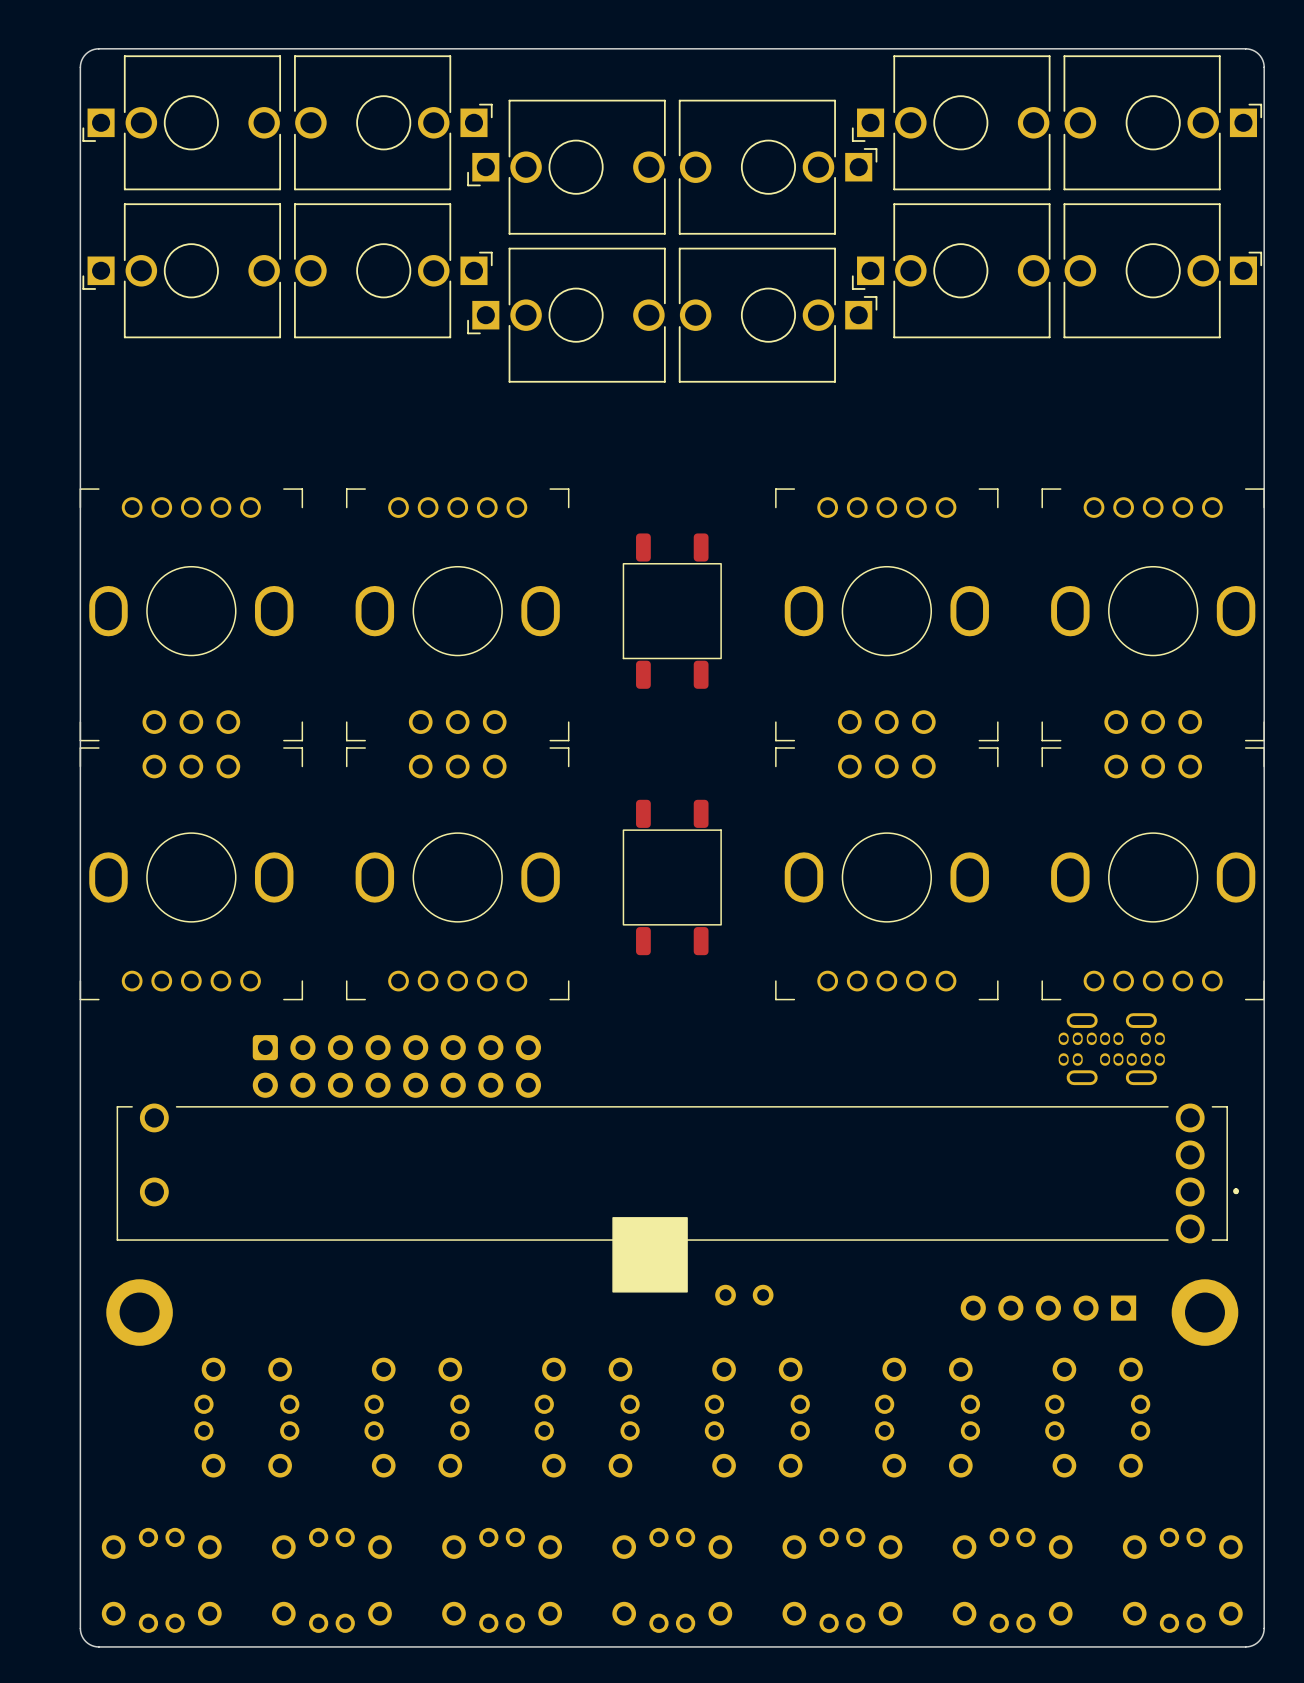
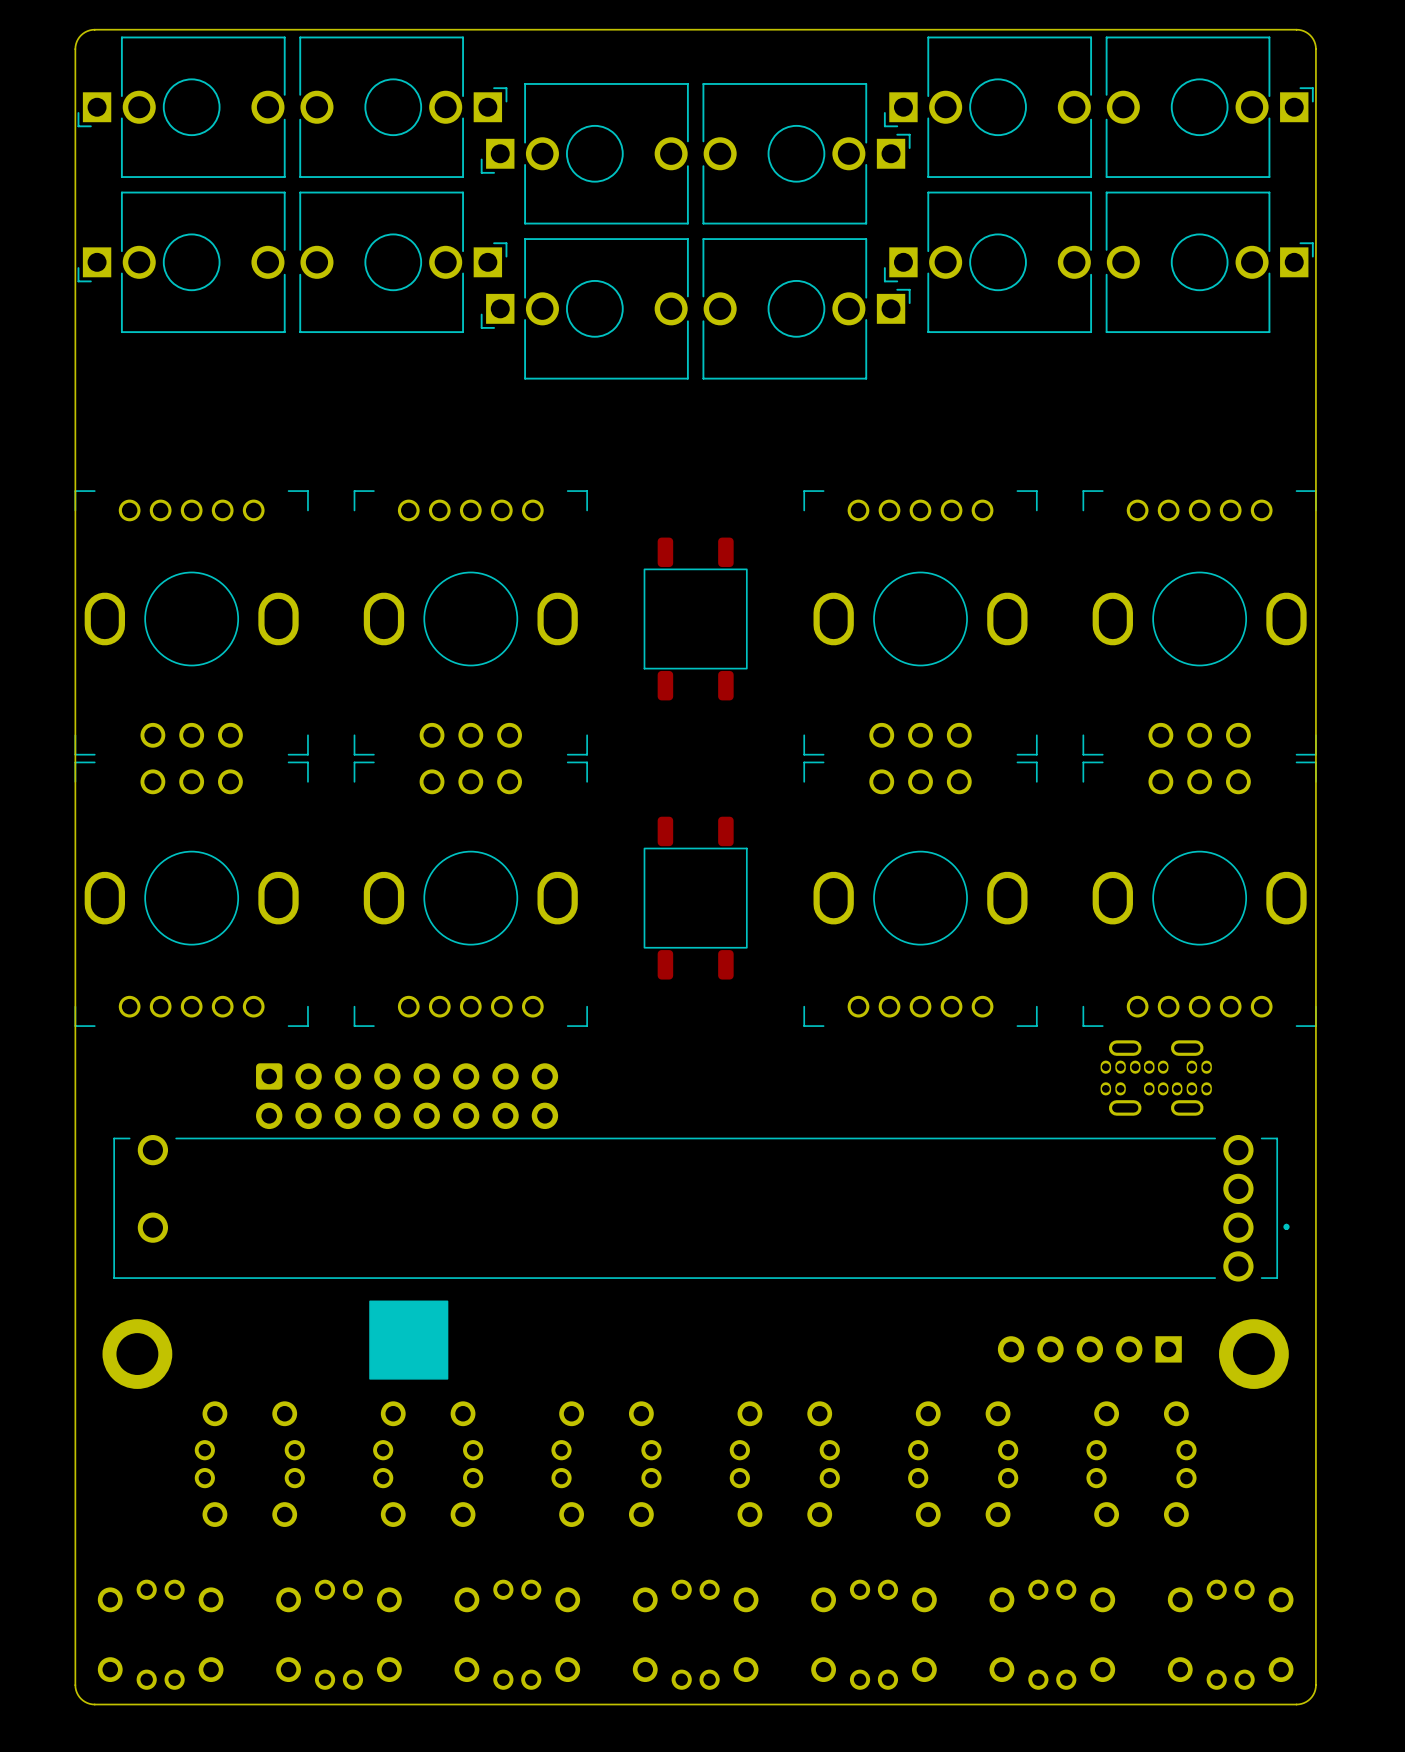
drawing position: (650, 1254) -> (408, 1340)
part: (744, 1295) -> none

